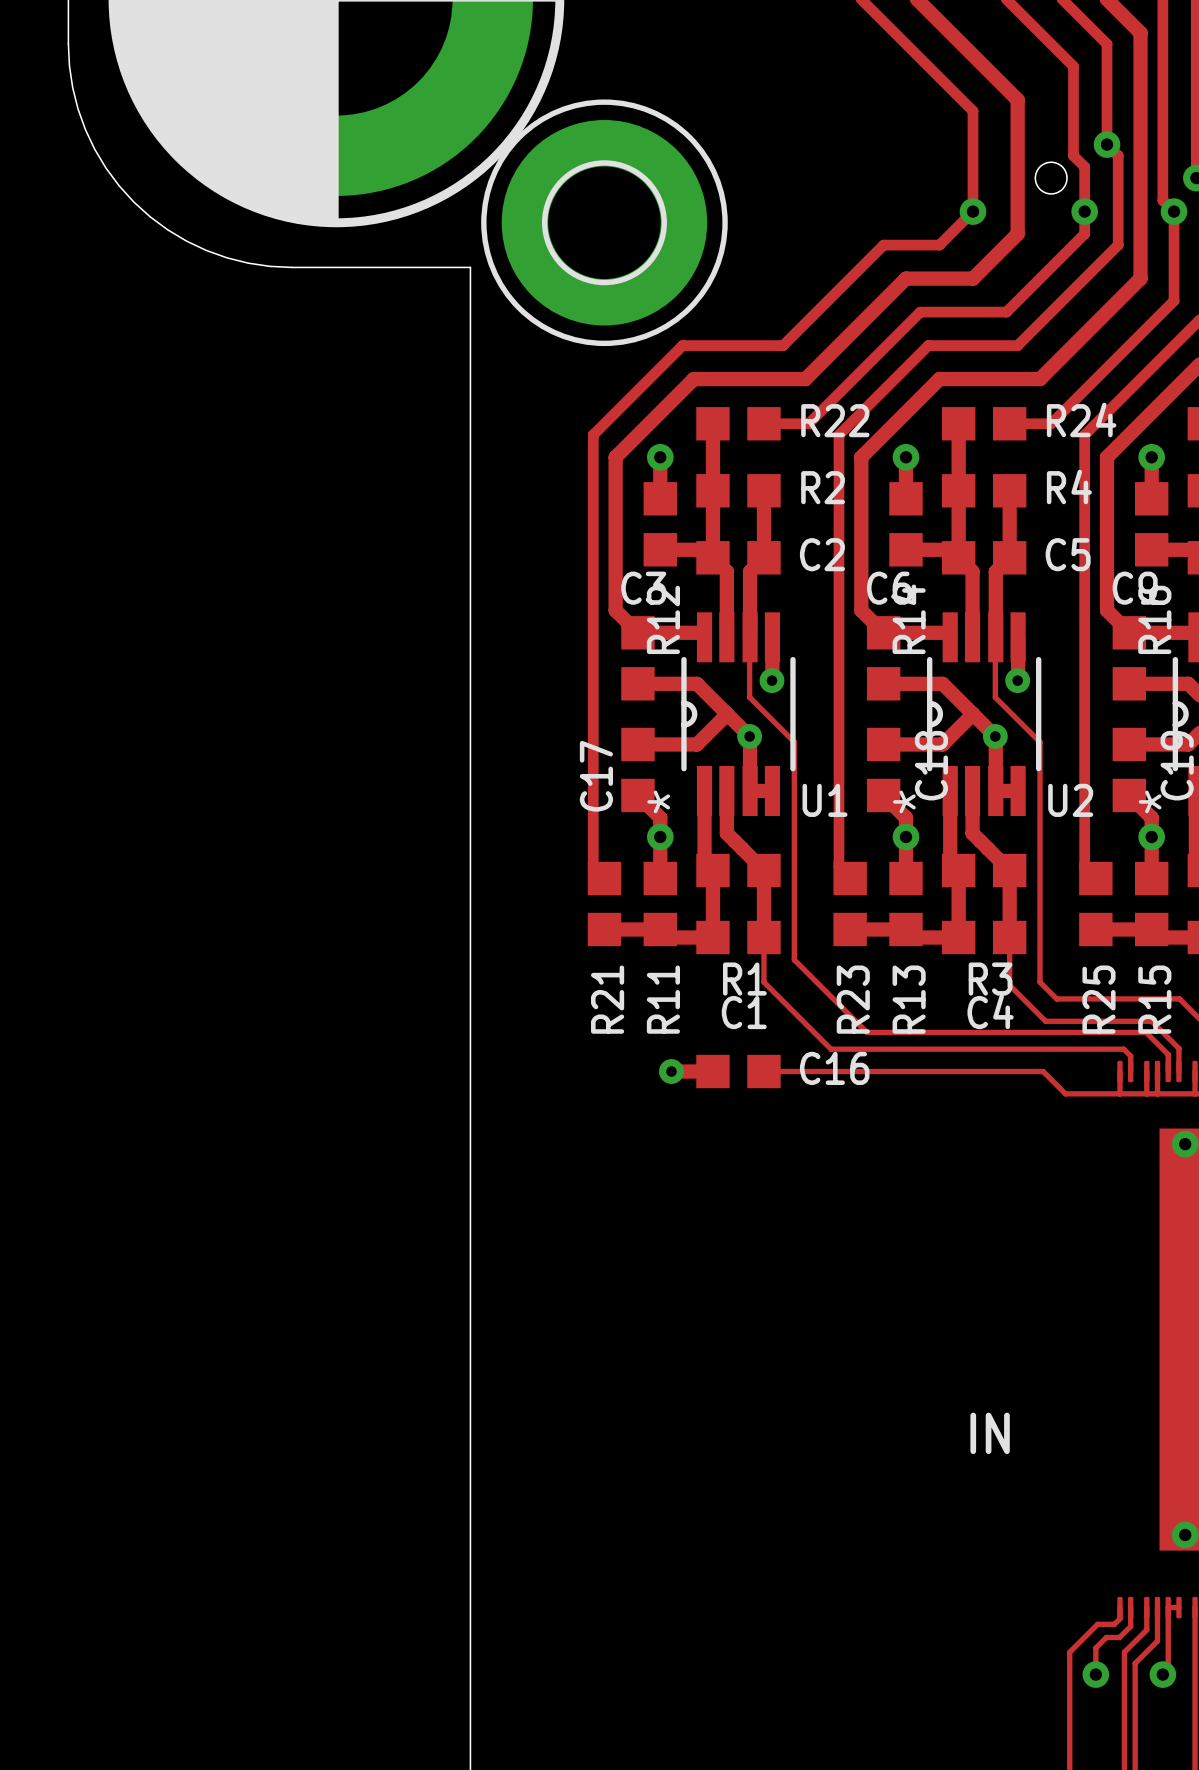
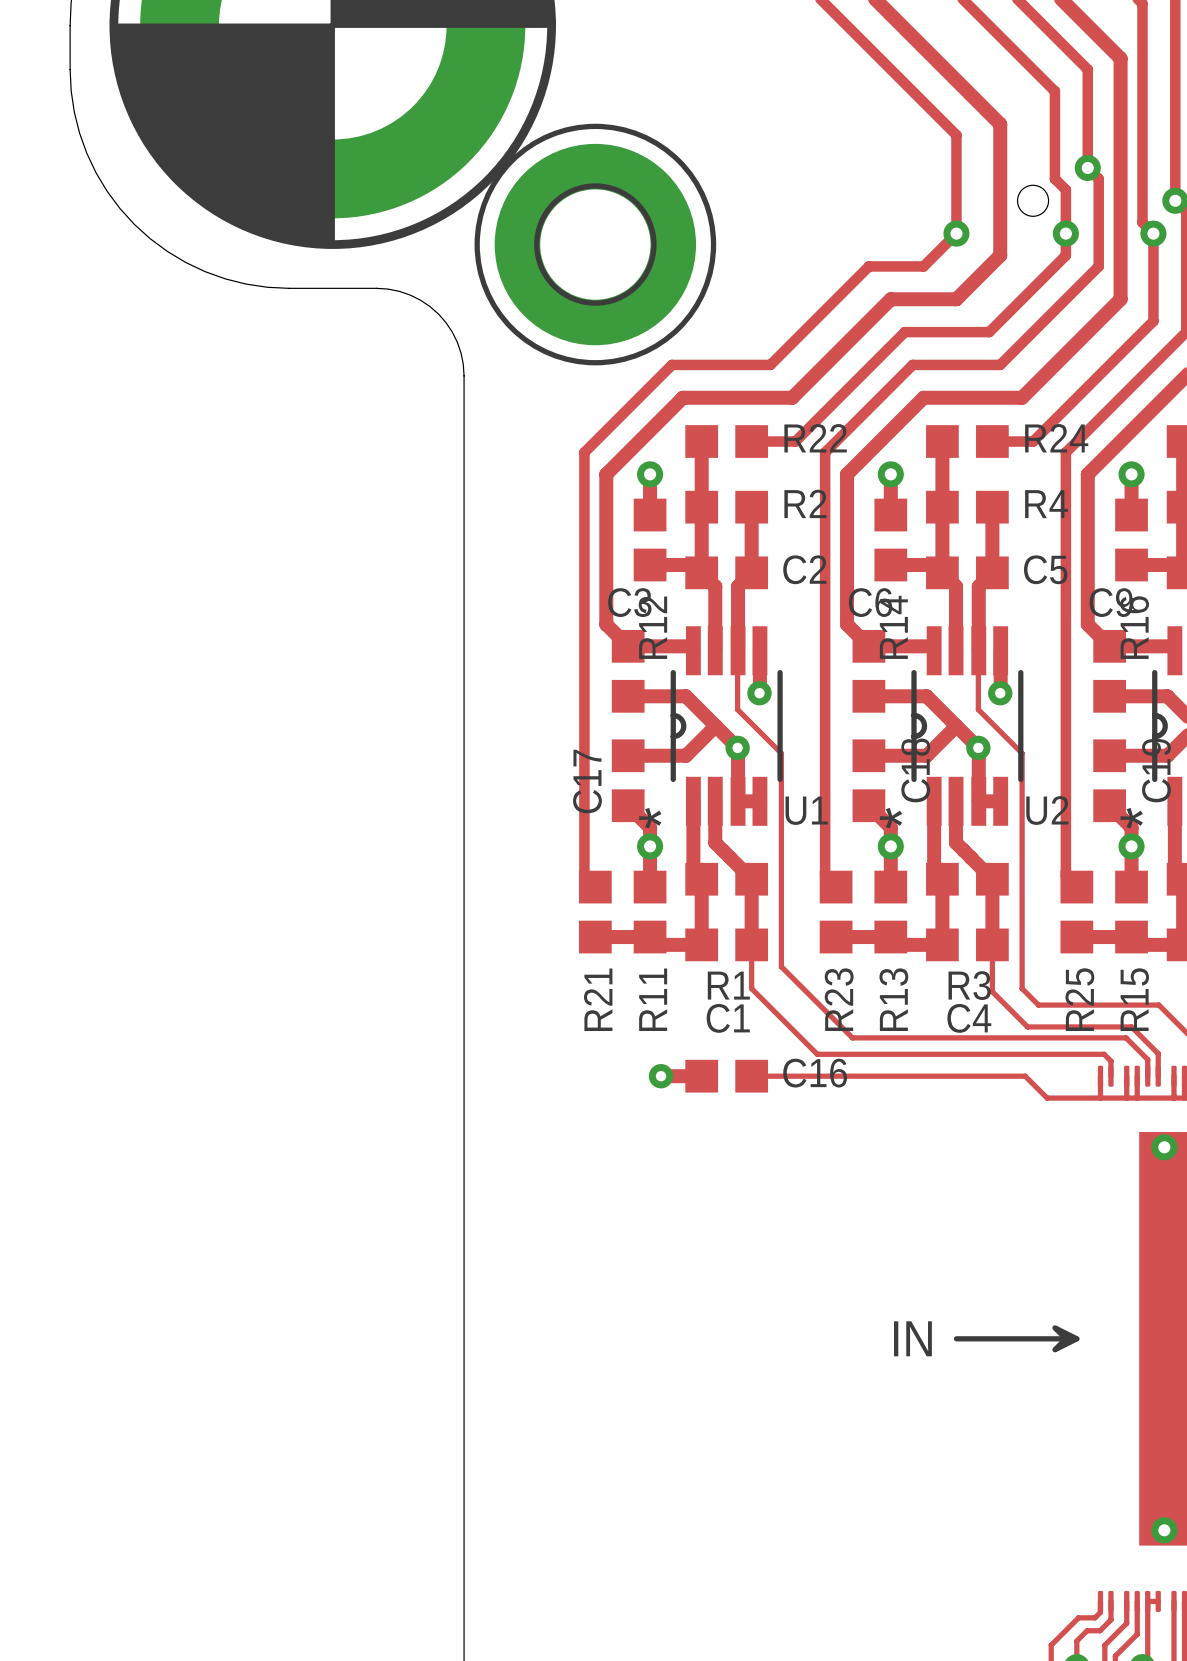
board edge: (381, 267) (470, 267) (470, 356) -> (376, 288) (410, 294) (438, 313) (457, 342) (464, 375)
drawing: none -> [1052, 1325, 1080, 1353]
line: none -> (956, 1338) (1076, 1338)
text position: IN (990, 1433) -> IN (912, 1338)

